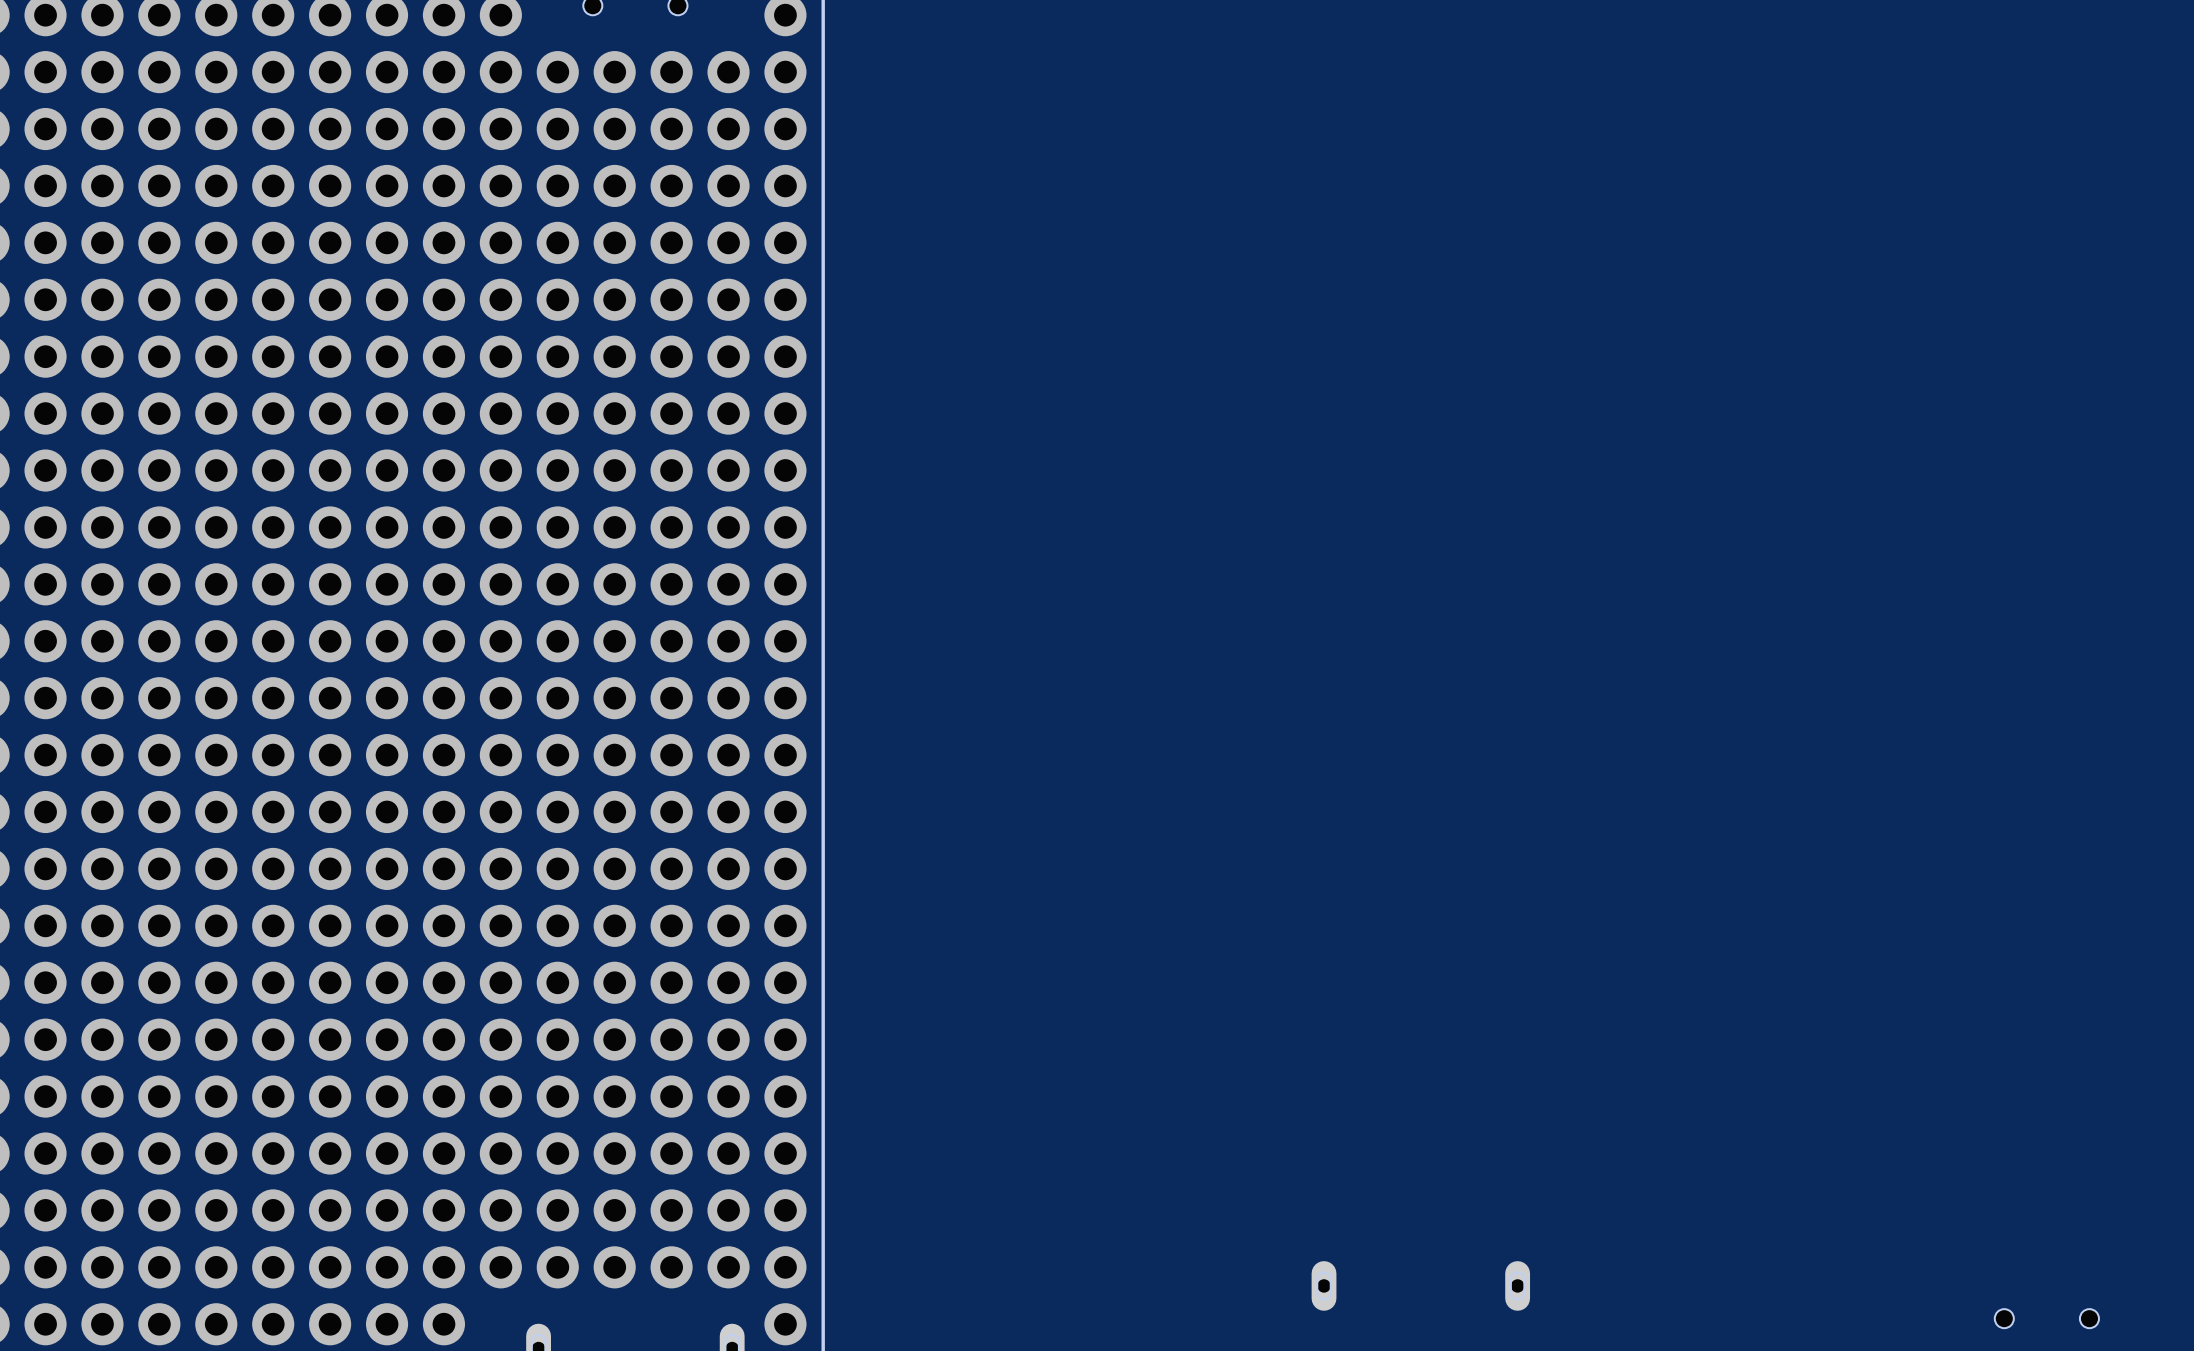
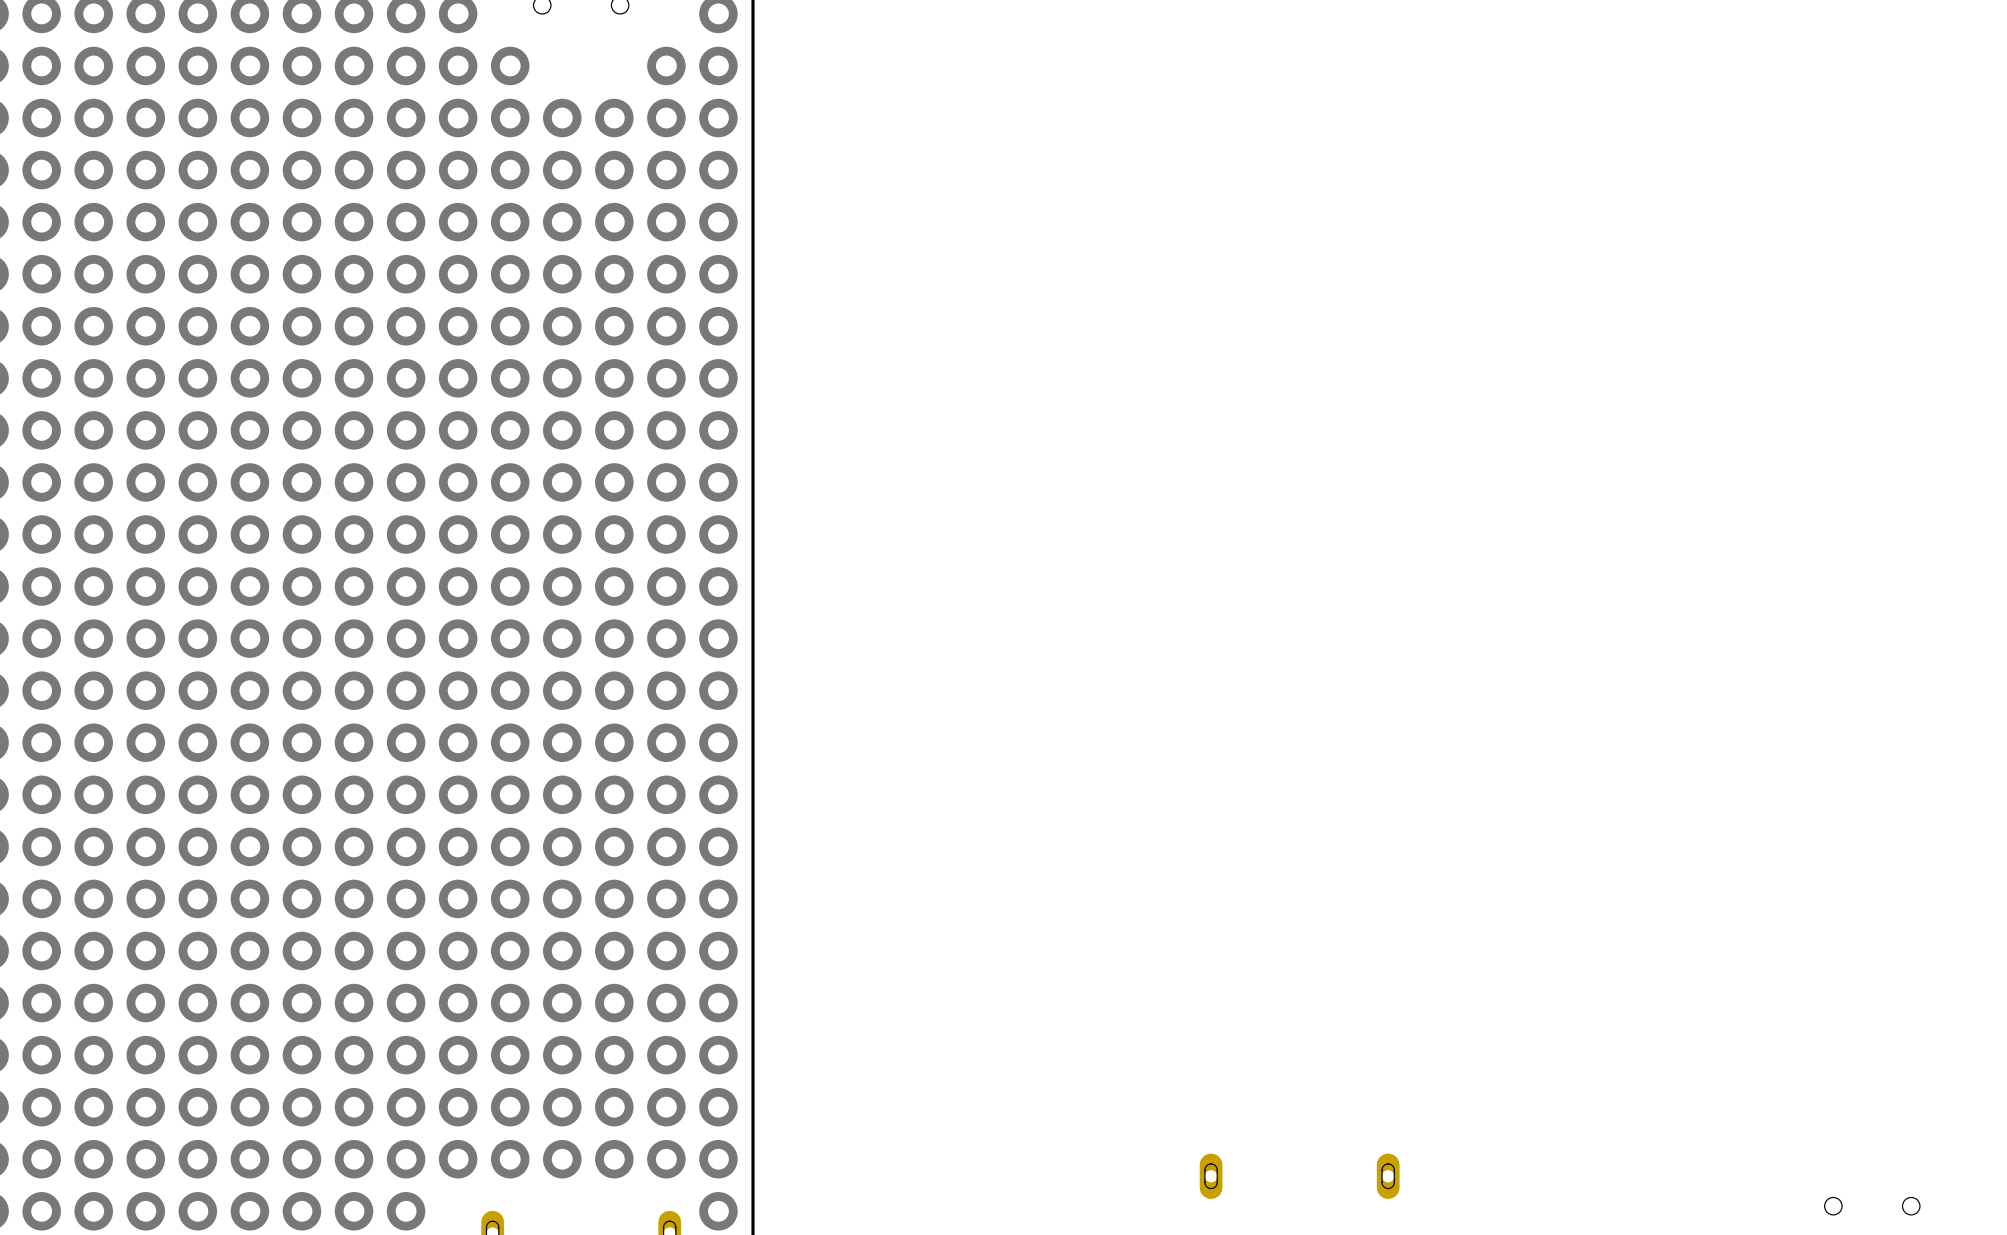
via: (614, 72) -> none
via: (671, 72) -> none

